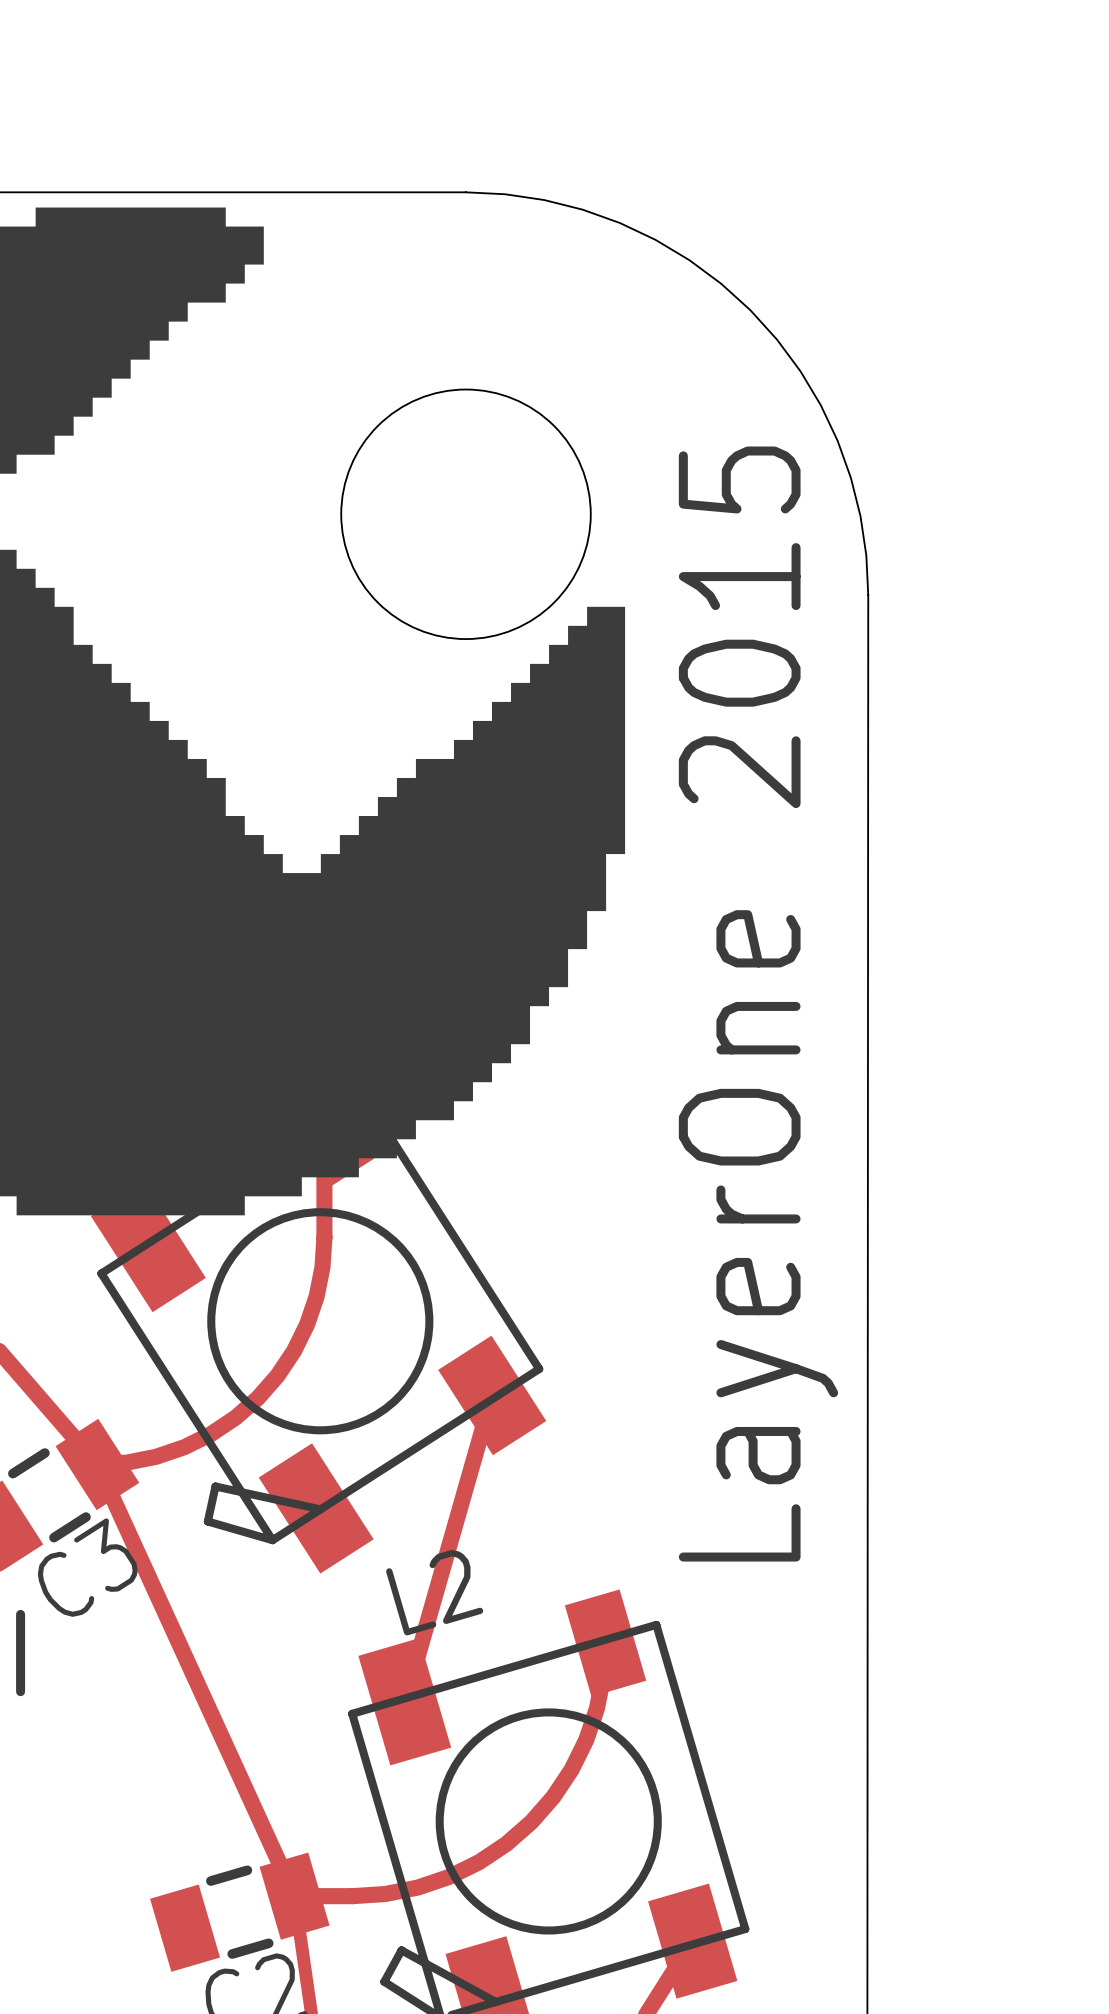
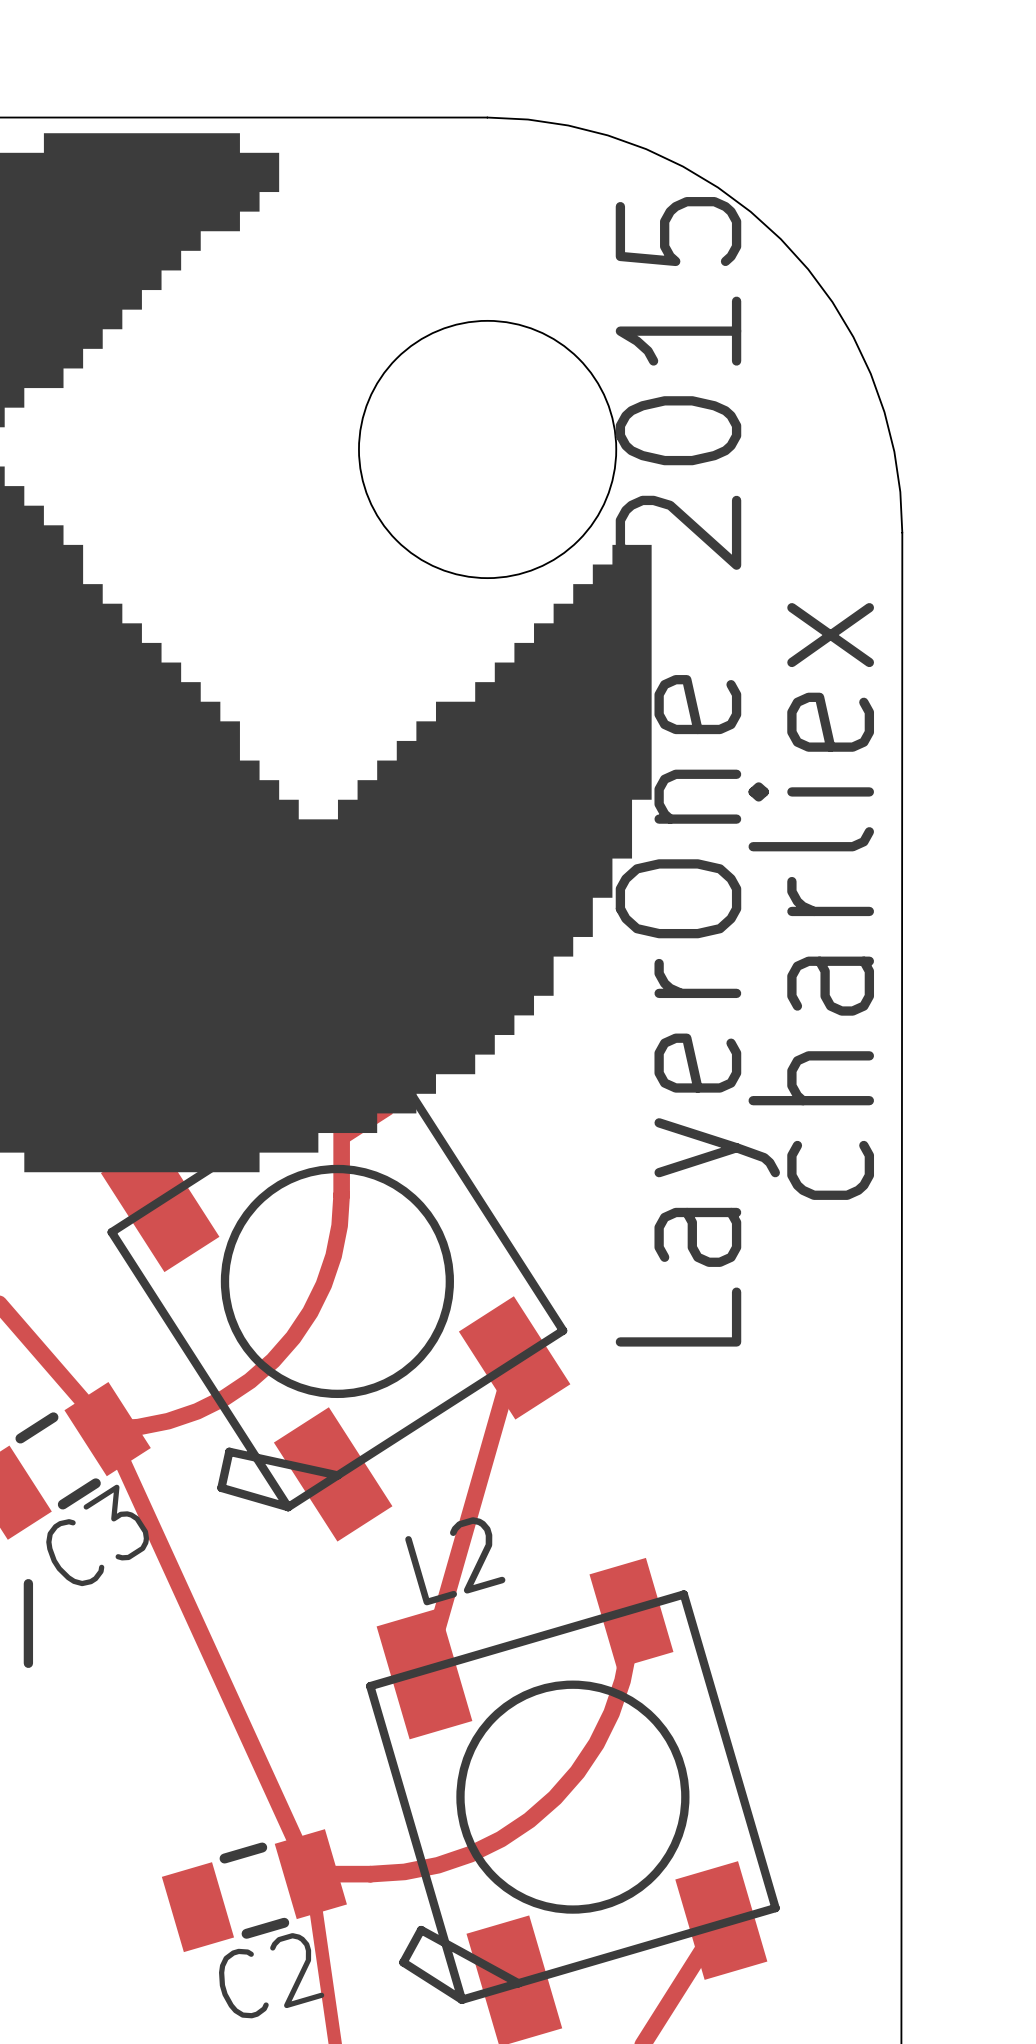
text: none -> charliex (811, 901)
text position: LayerOne 2015 (758, 1004) -> LayerOne 2015 (697, 771)

